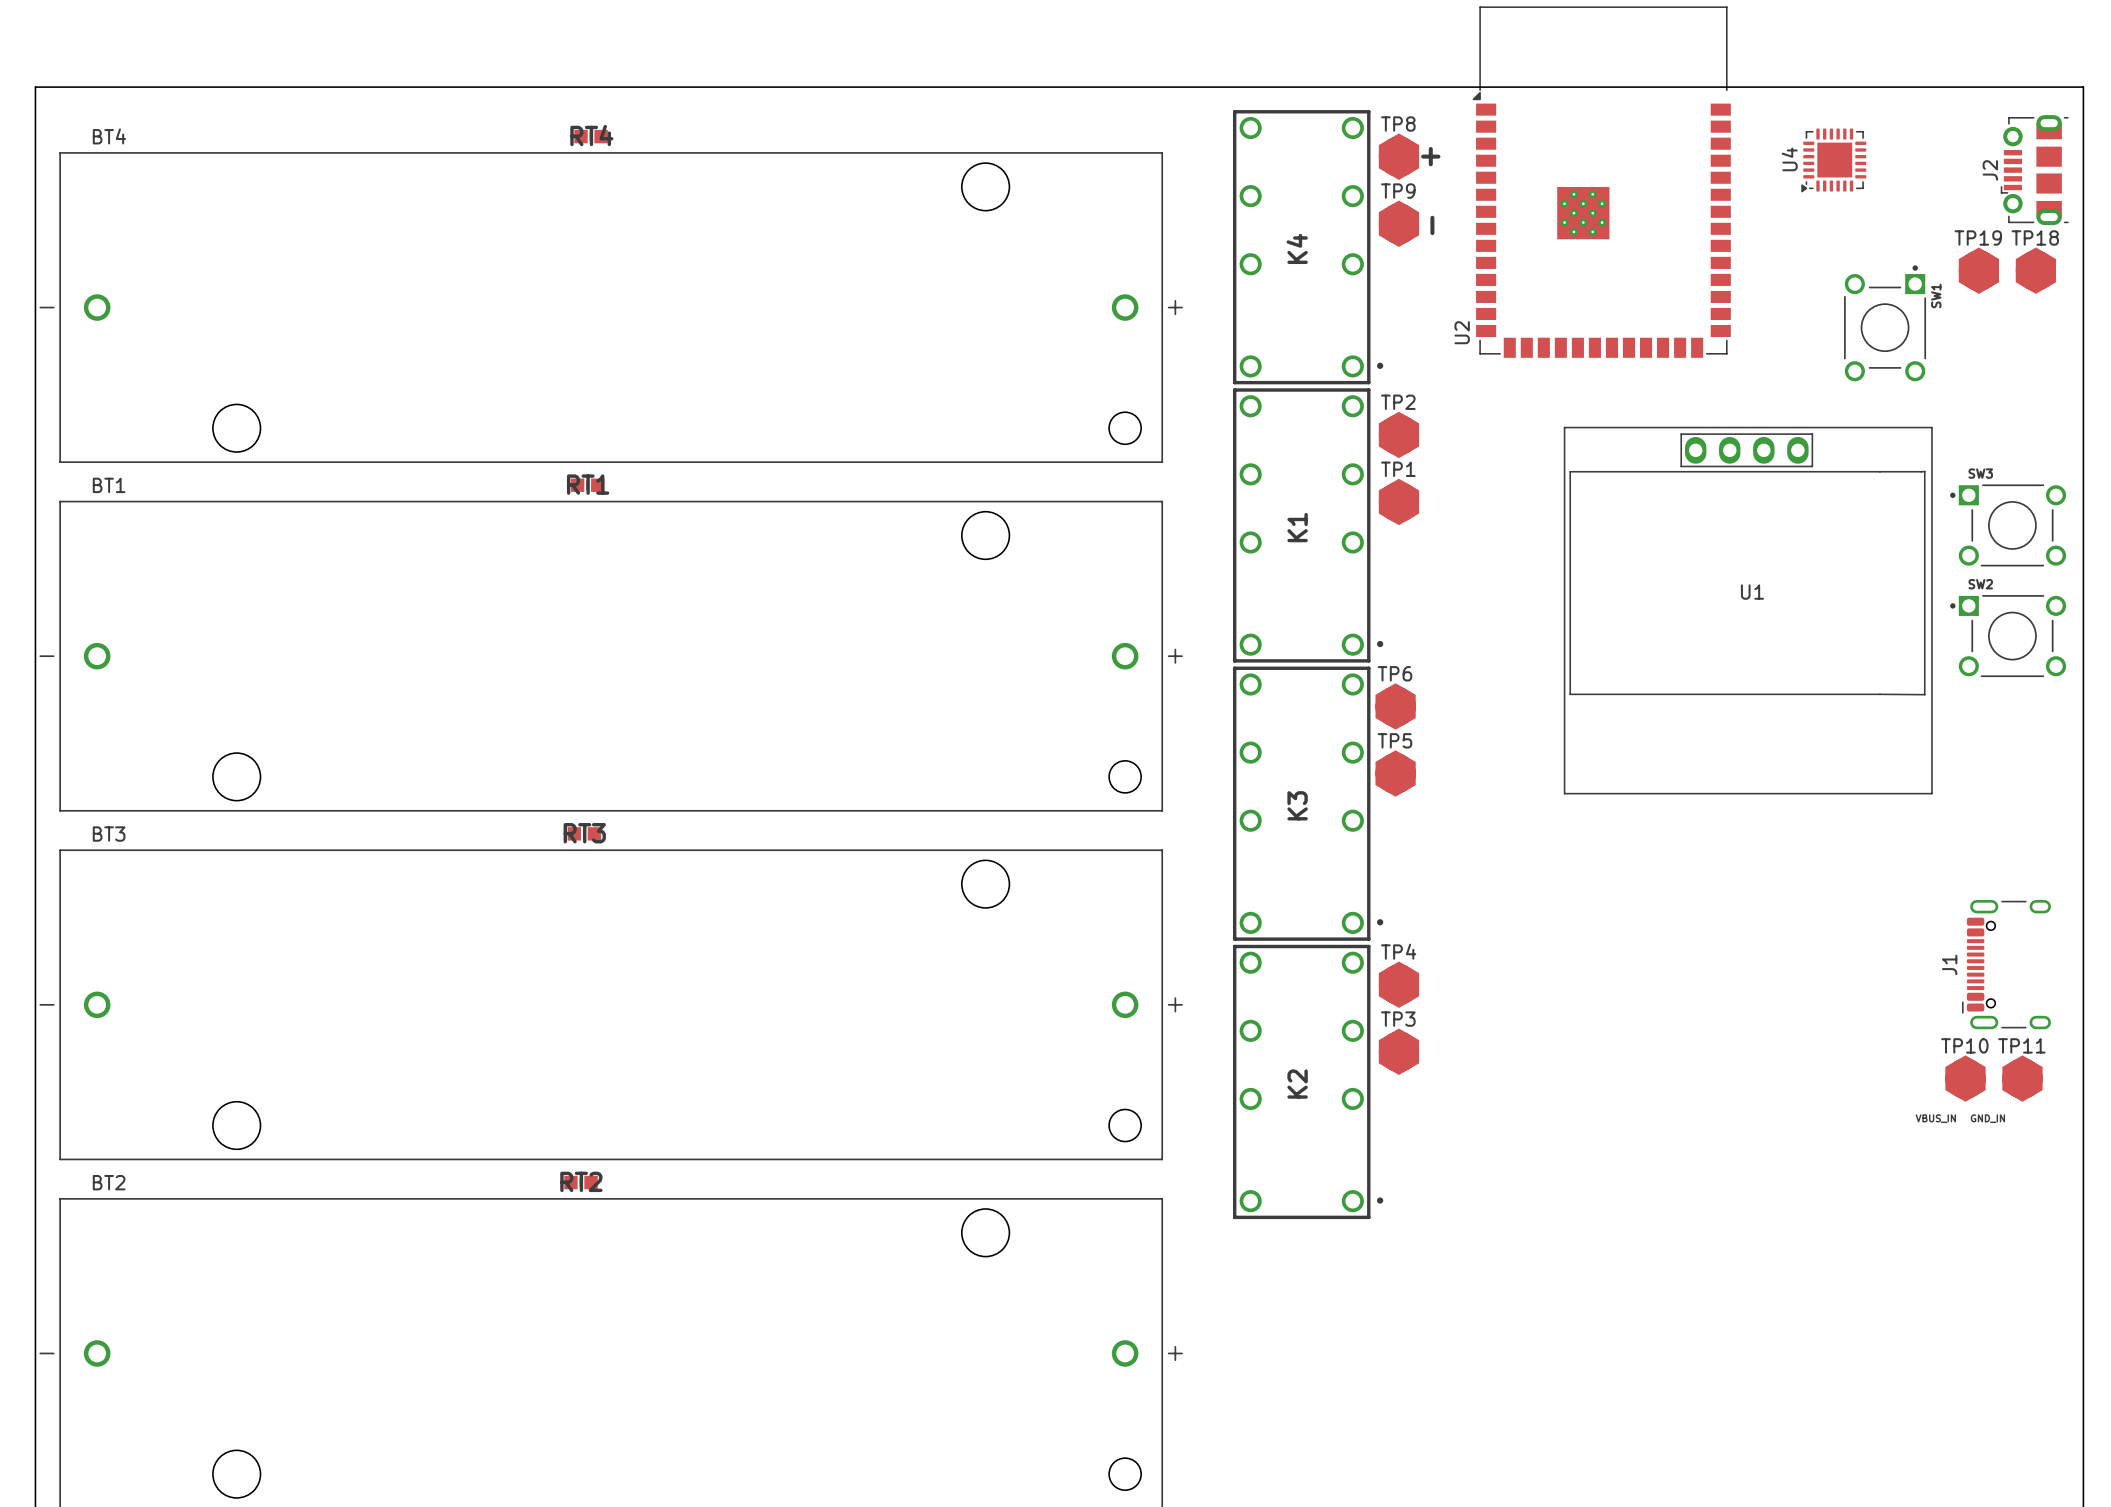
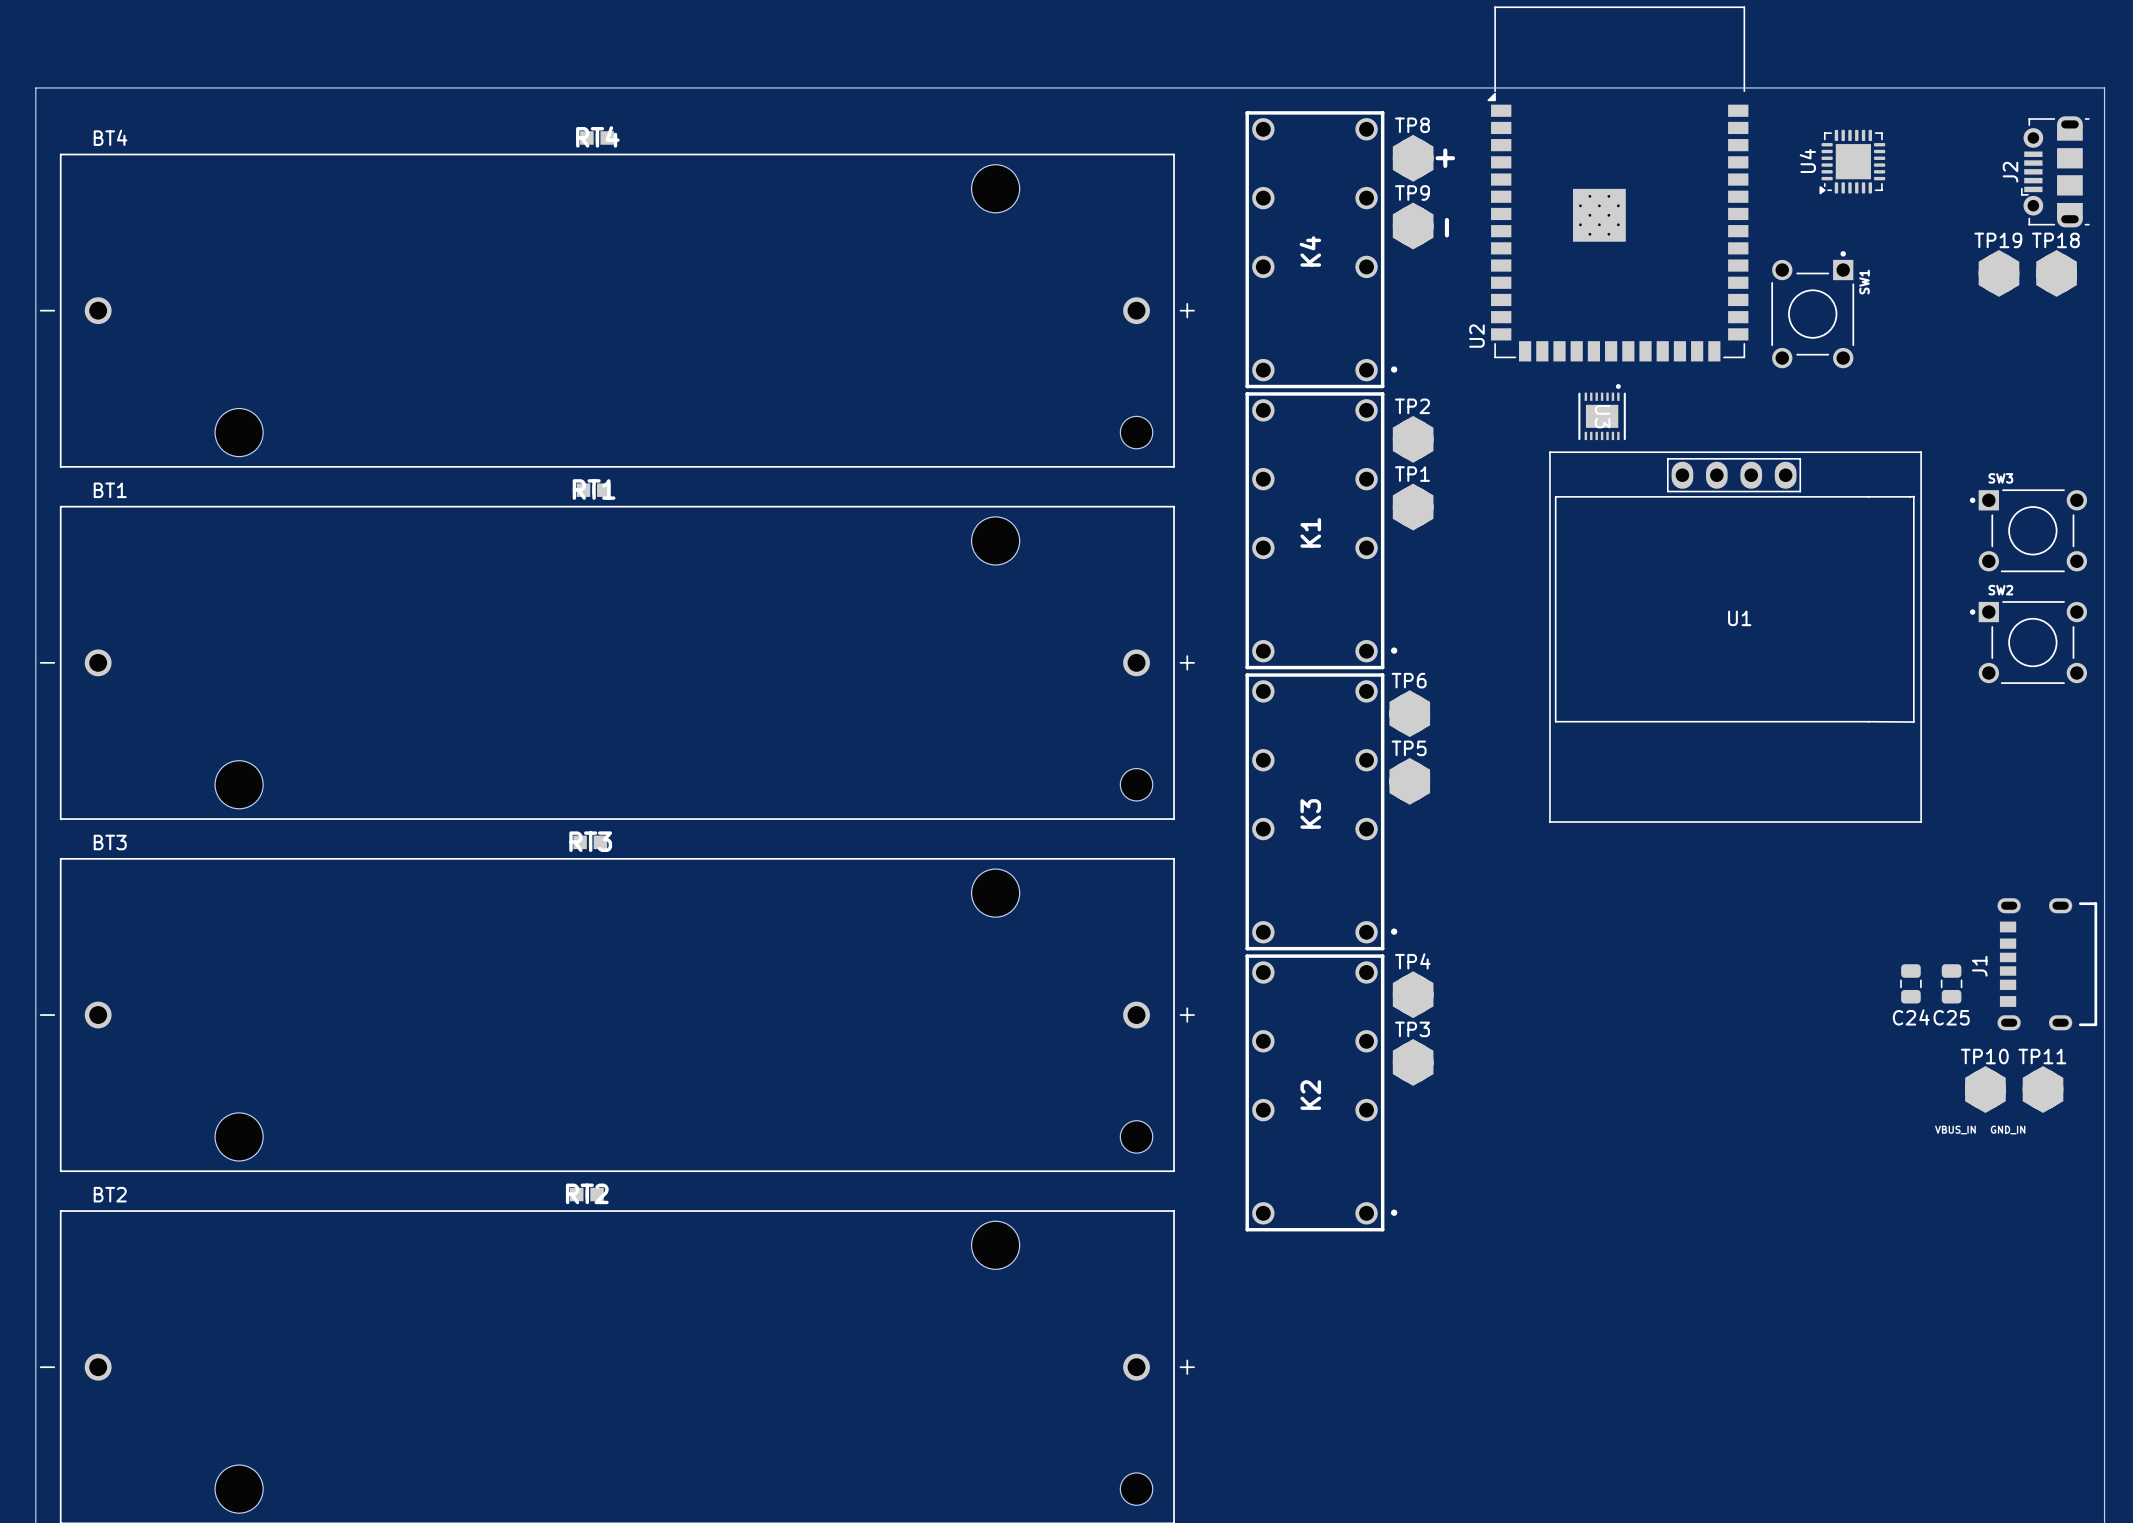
SW1 position: (1885, 323) -> (1812, 309)
part: none -> (1602, 412)
U1 position: (1748, 610) -> (1735, 637)
J1 footprint: [1962, 899, 2051, 1030] -> [1997, 898, 2098, 1031]
C24: none -> (1910, 983)
C25: none -> (1951, 983)

